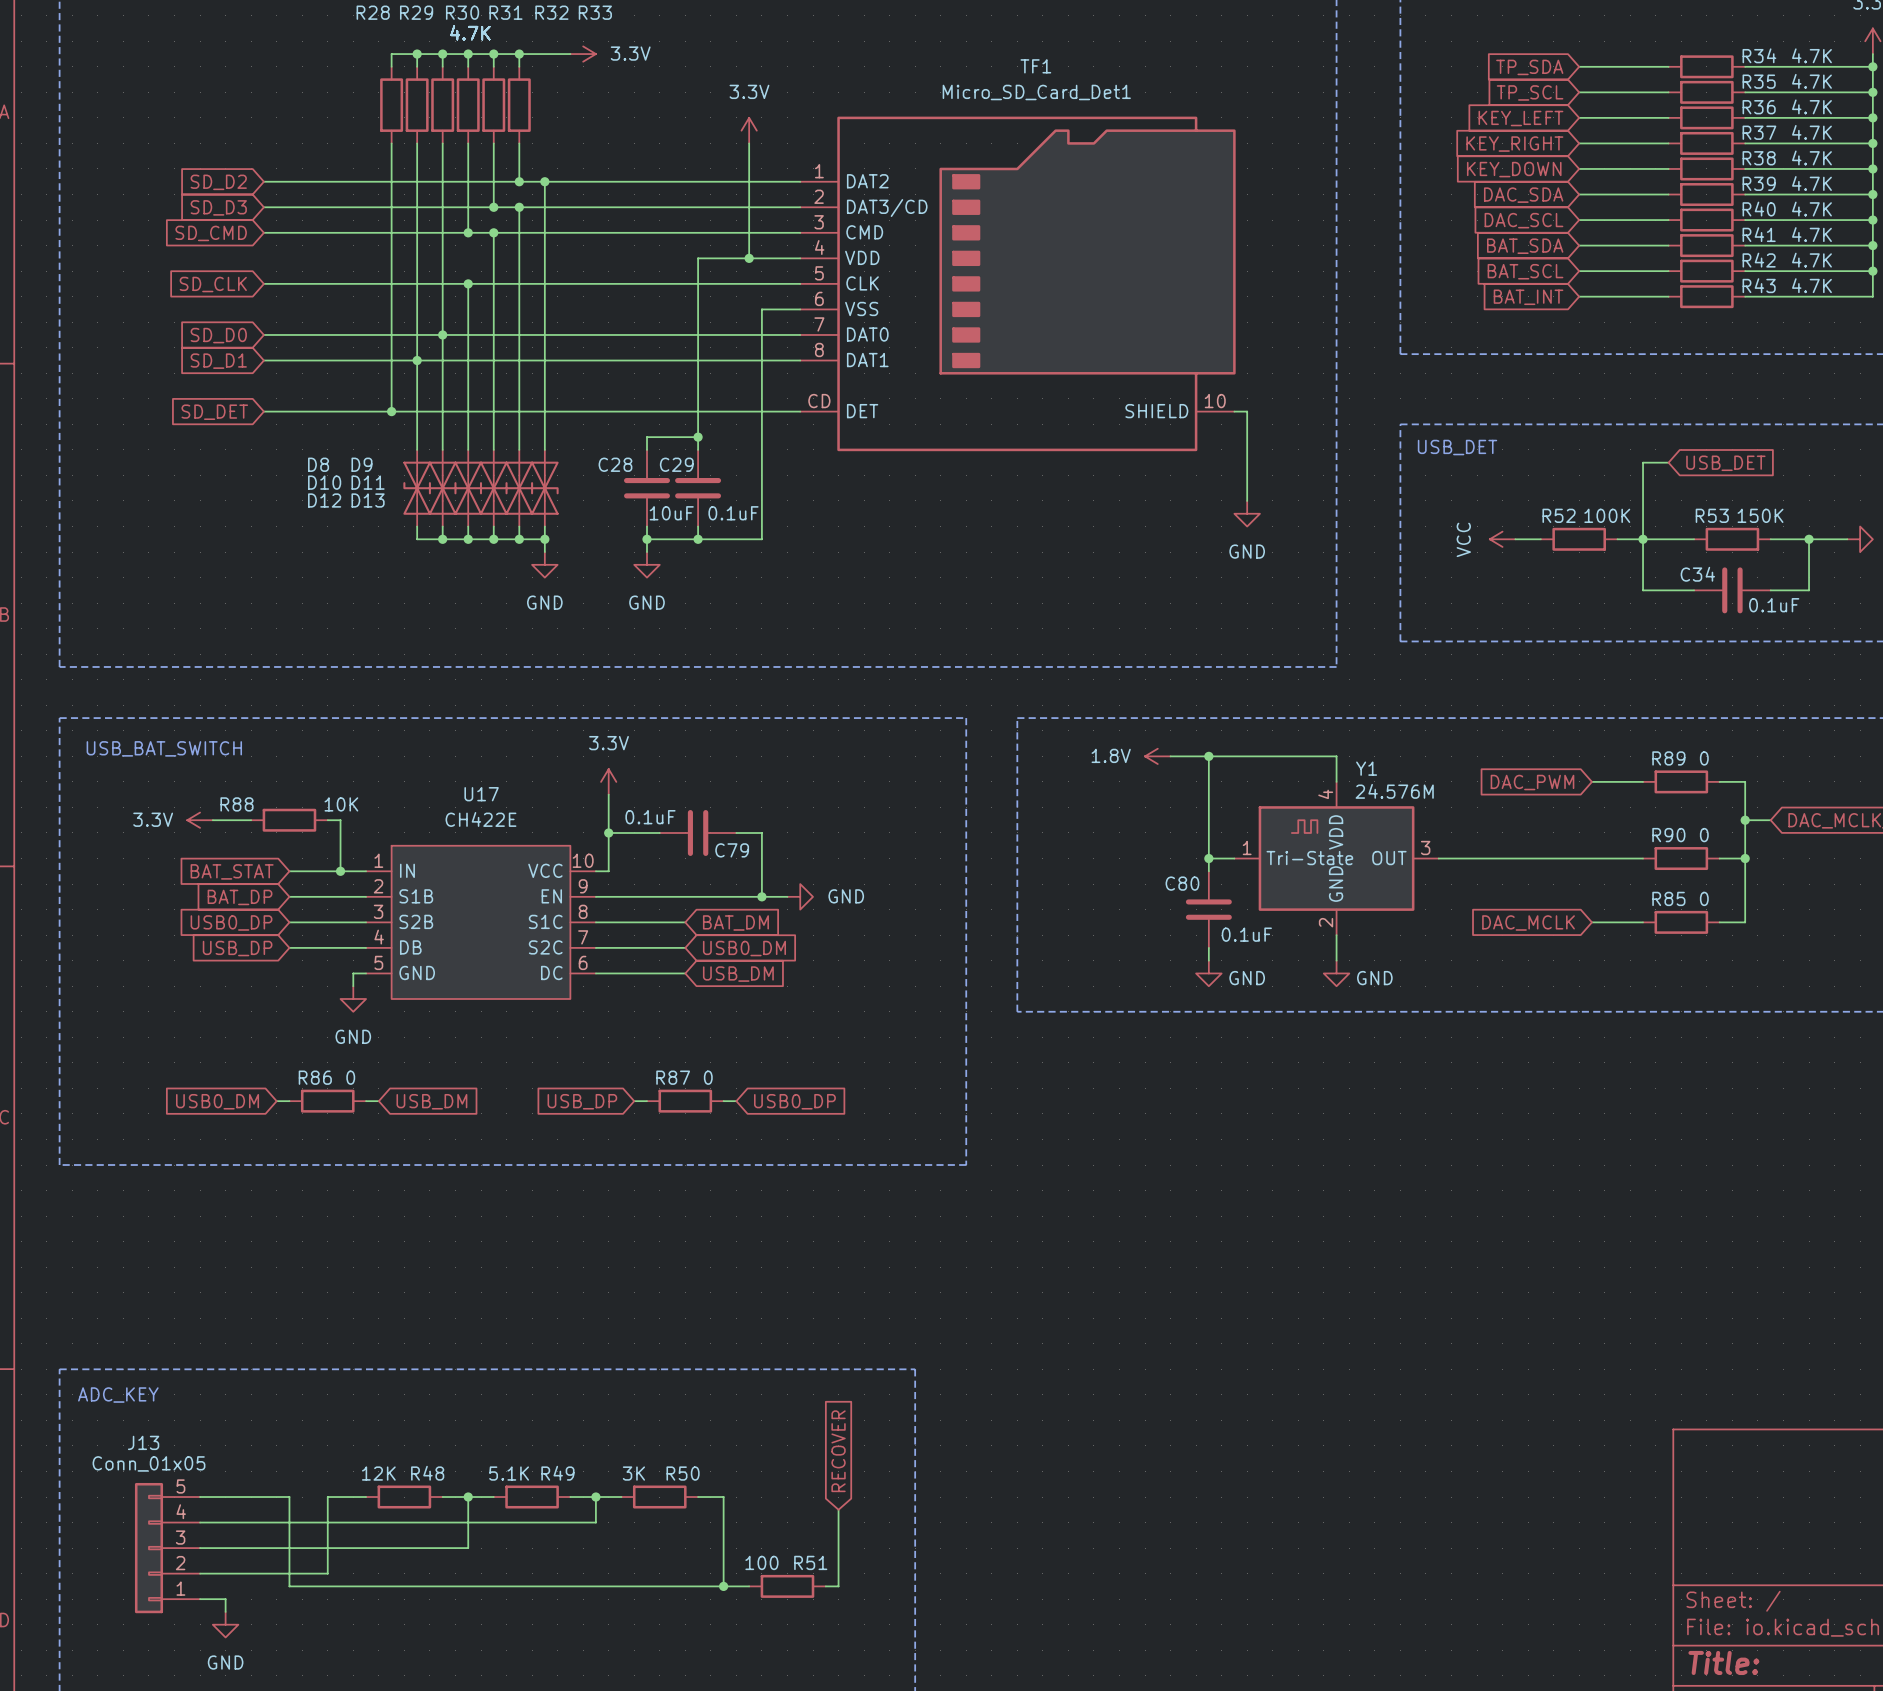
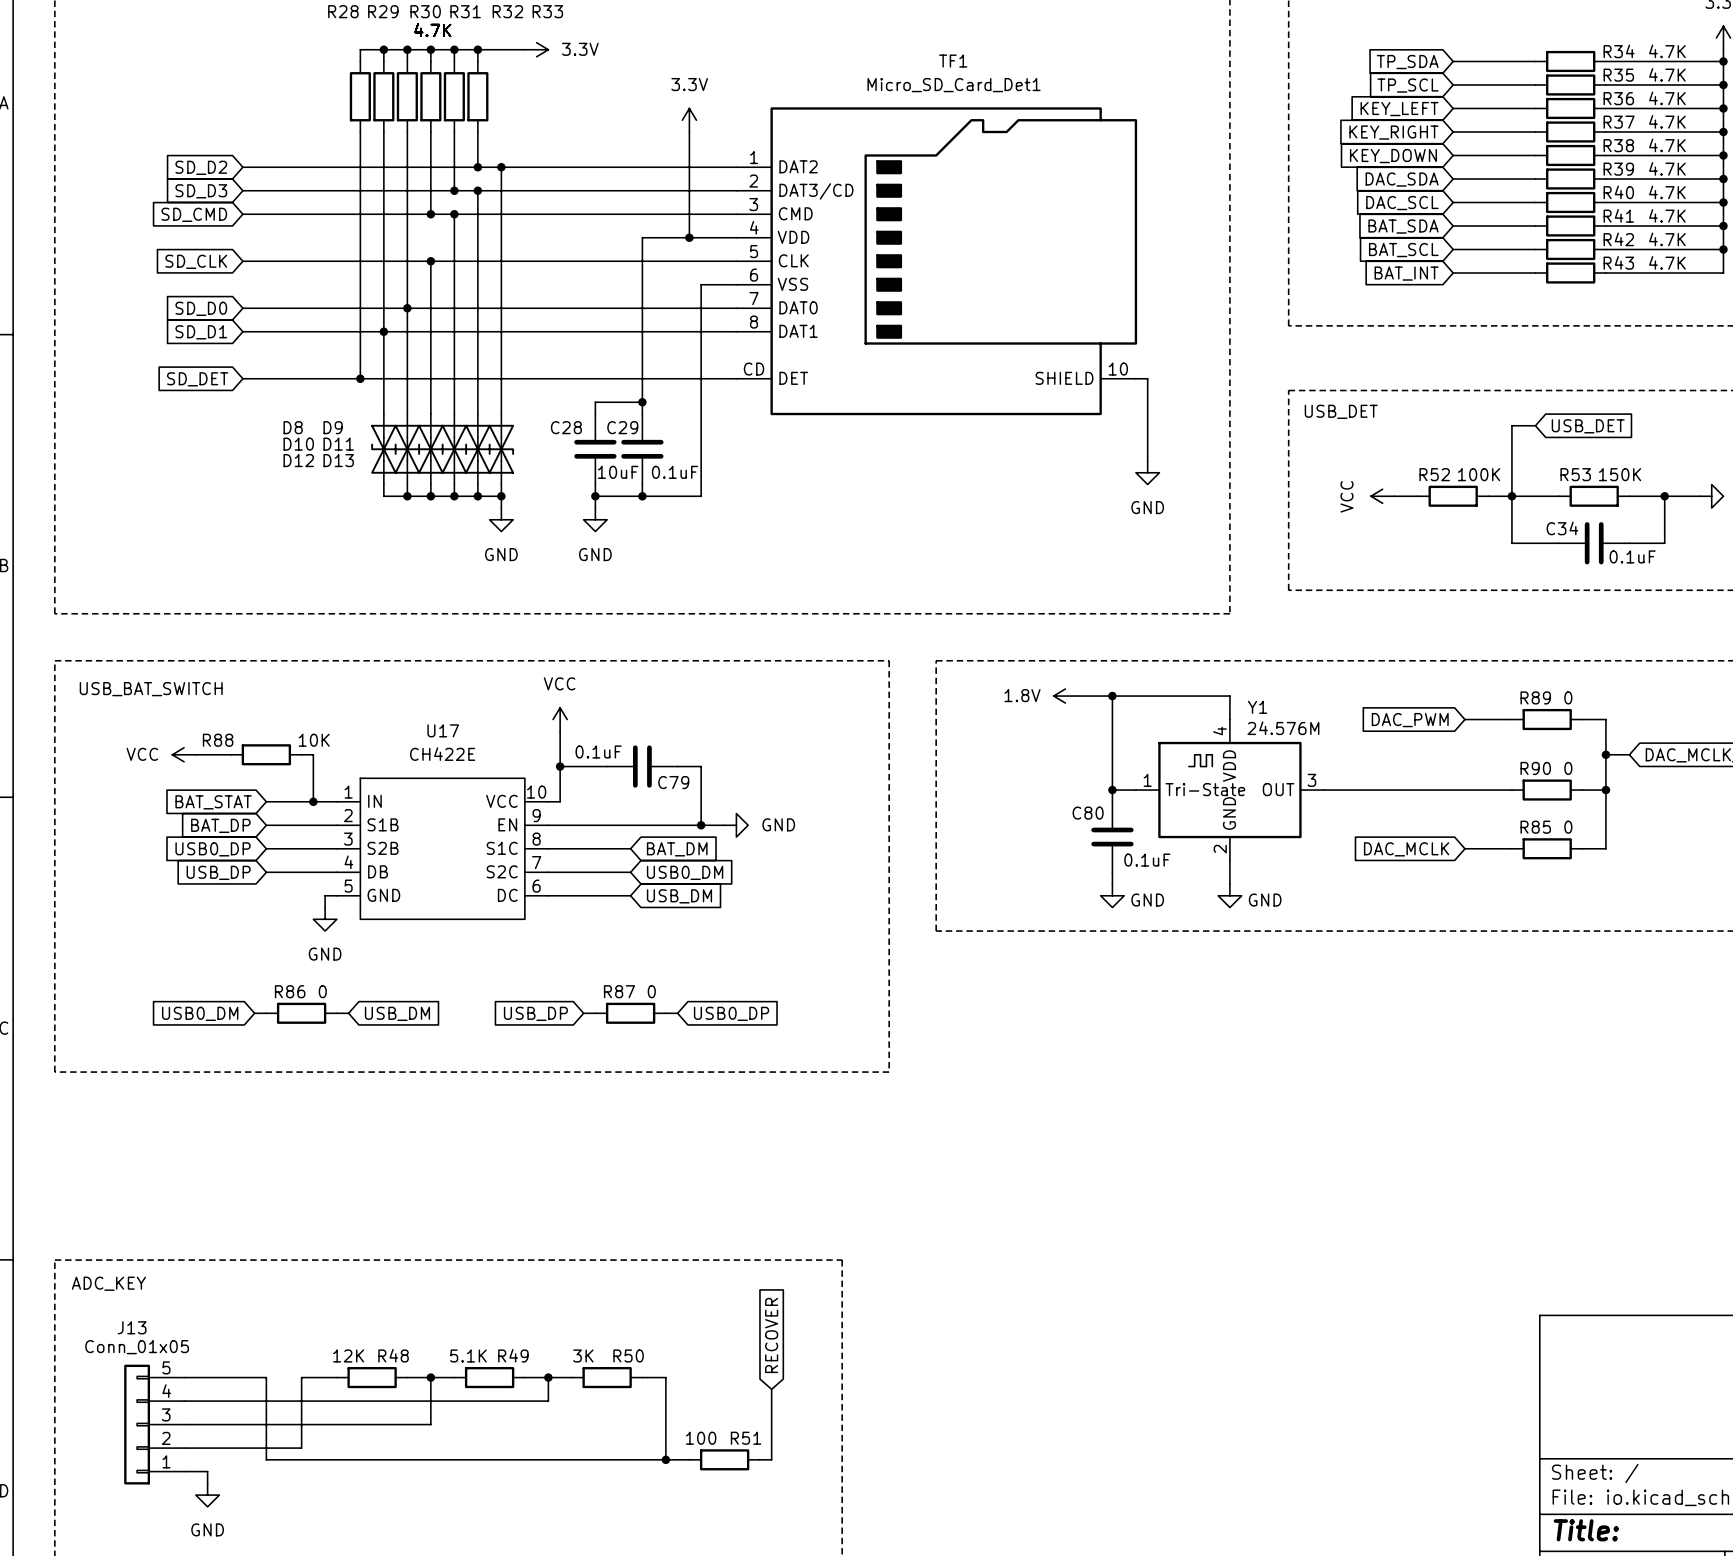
power symbol: 3.3V (608, 781) -> VCC (560, 719)
power symbol: 3.3V (200, 820) -> VCC (184, 754)

